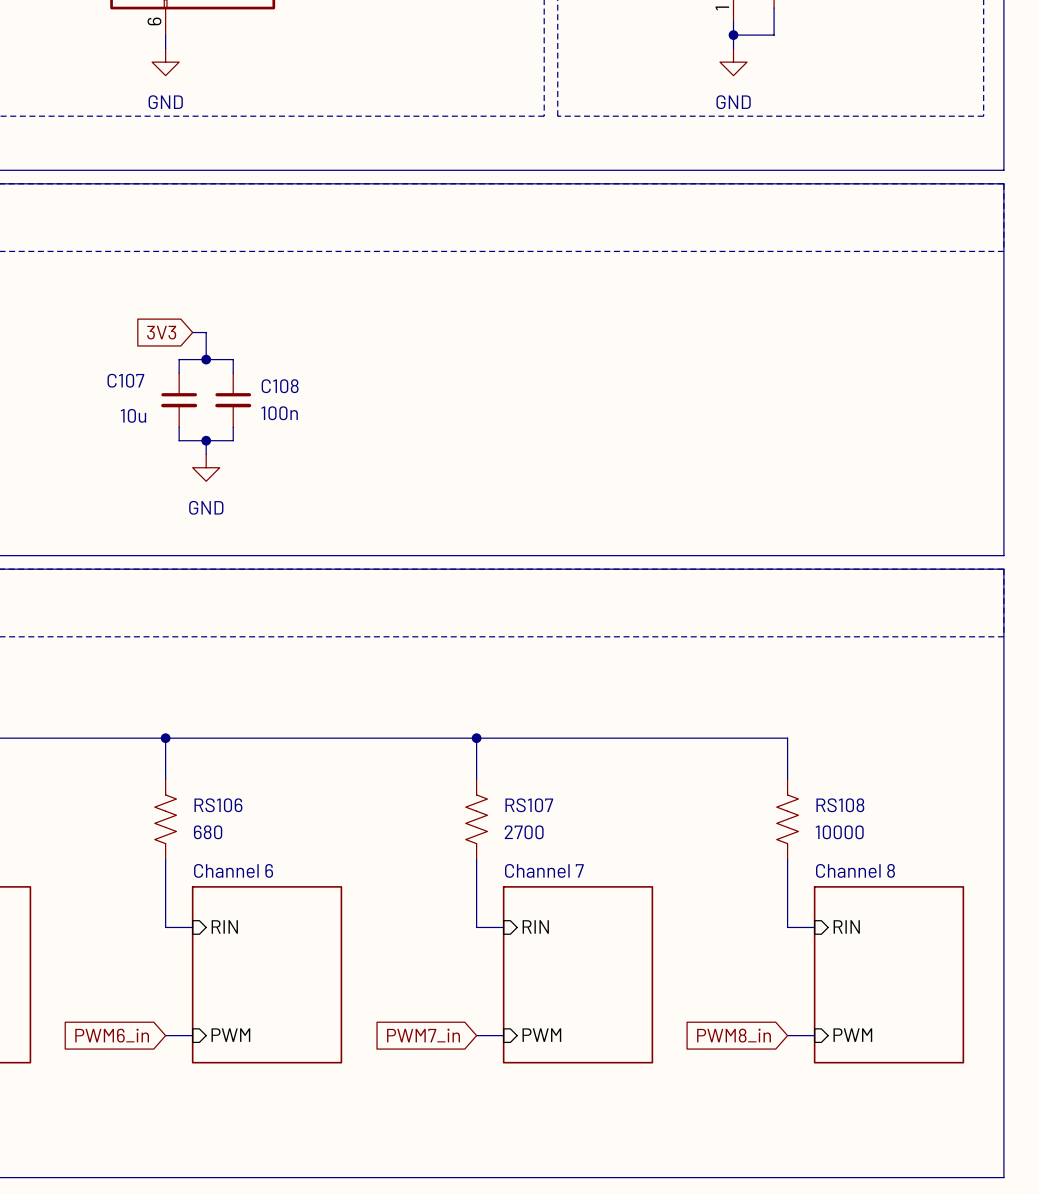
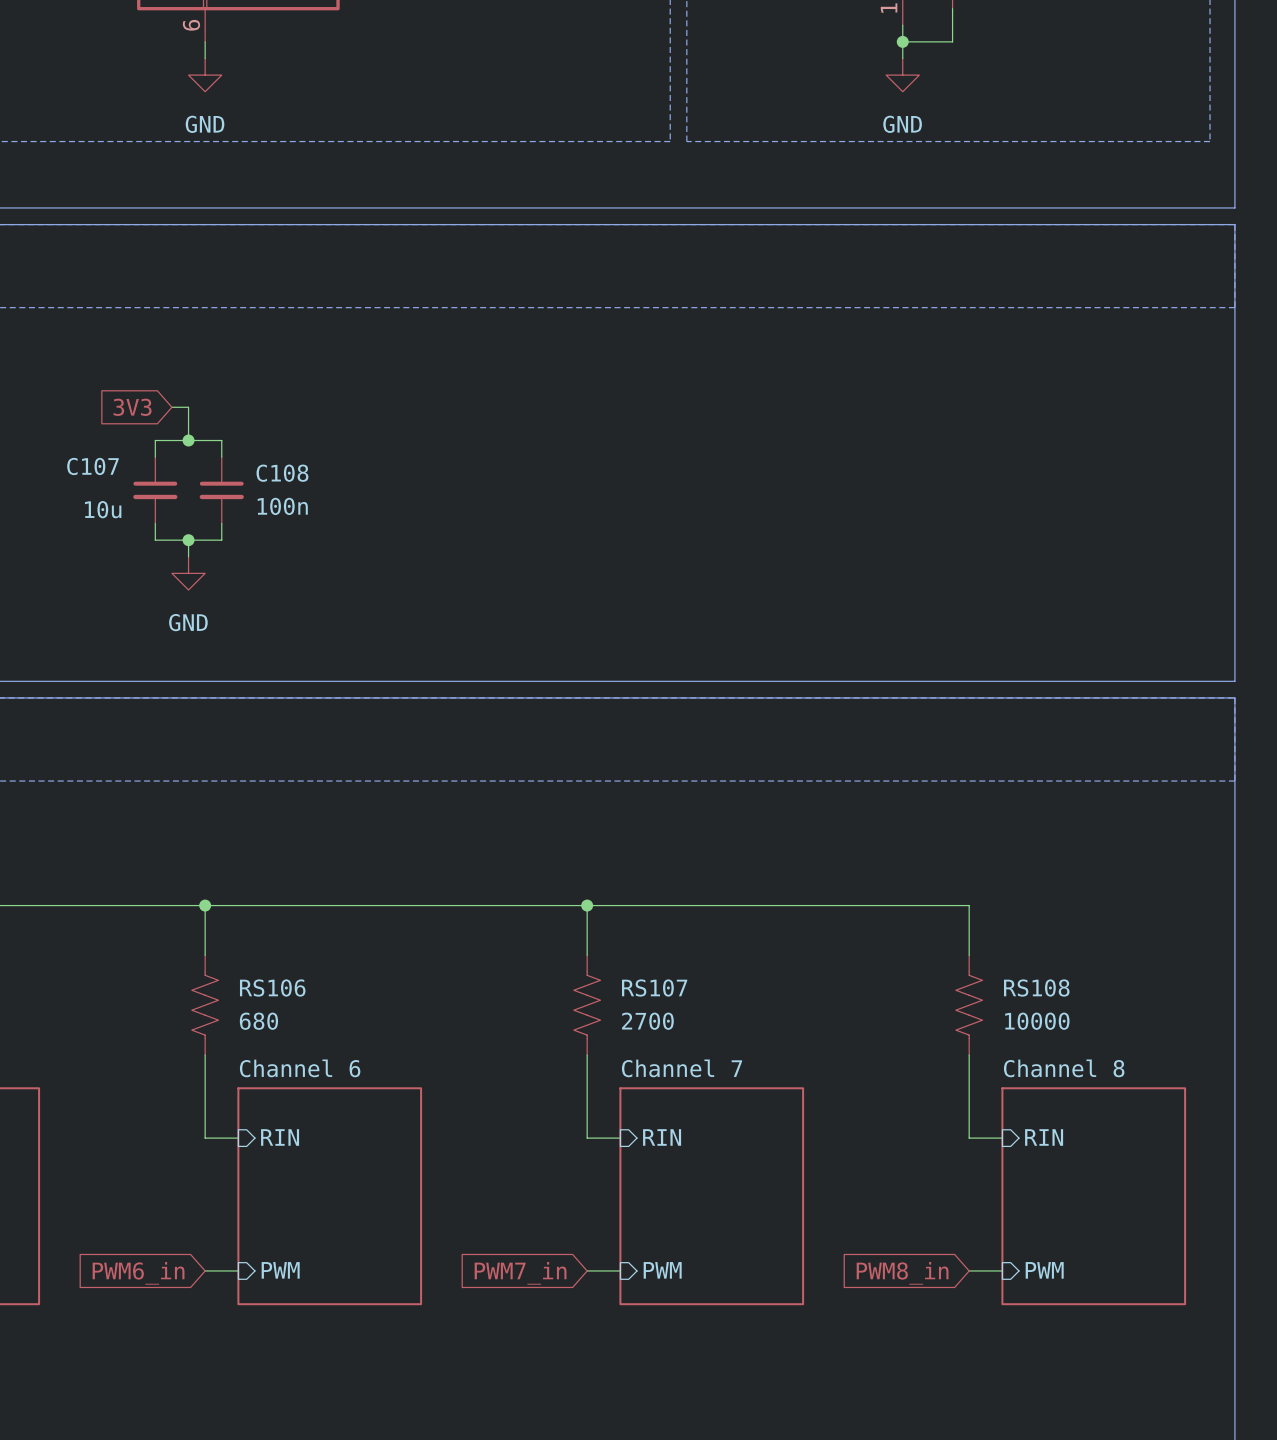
global label position: 3V3 (161, 332) -> 3V3 (132, 407)
wire: (192, 332) (206, 332) (206, 359) -> (171, 407) (188, 407) (188, 440)
junction: none -> (188, 440)
wire: (179, 359) (233, 359) (233, 373) -> (221, 440) (155, 440) (155, 457)
junction: (206, 359) -> none
C107 name: C107 (125, 380) -> C108 (282, 473)
C107: none -> 10u (155, 490)
C108: 100n (233, 400) -> none
C107 value: 10u (133, 415) -> 100n (282, 506)
wire: (233, 427) (233, 440) (179, 440) -> (155, 523) (155, 540) (221, 540)
junction: none -> (188, 540)
wire: (206, 440) (206, 454) -> (188, 540) (188, 556)
junction: (206, 440) -> none
power symbol position: GND (206, 467) -> GND (188, 573)

